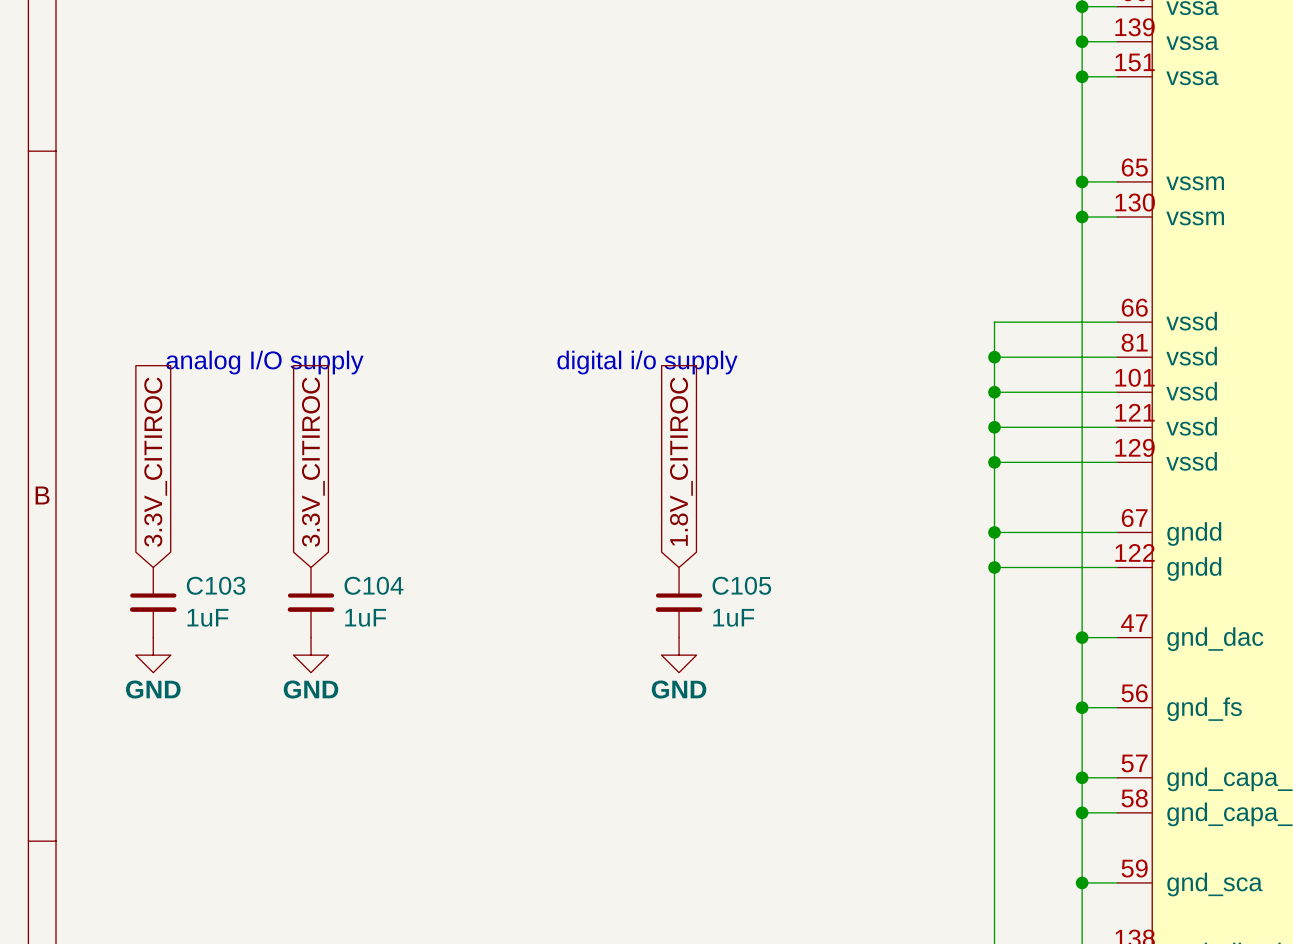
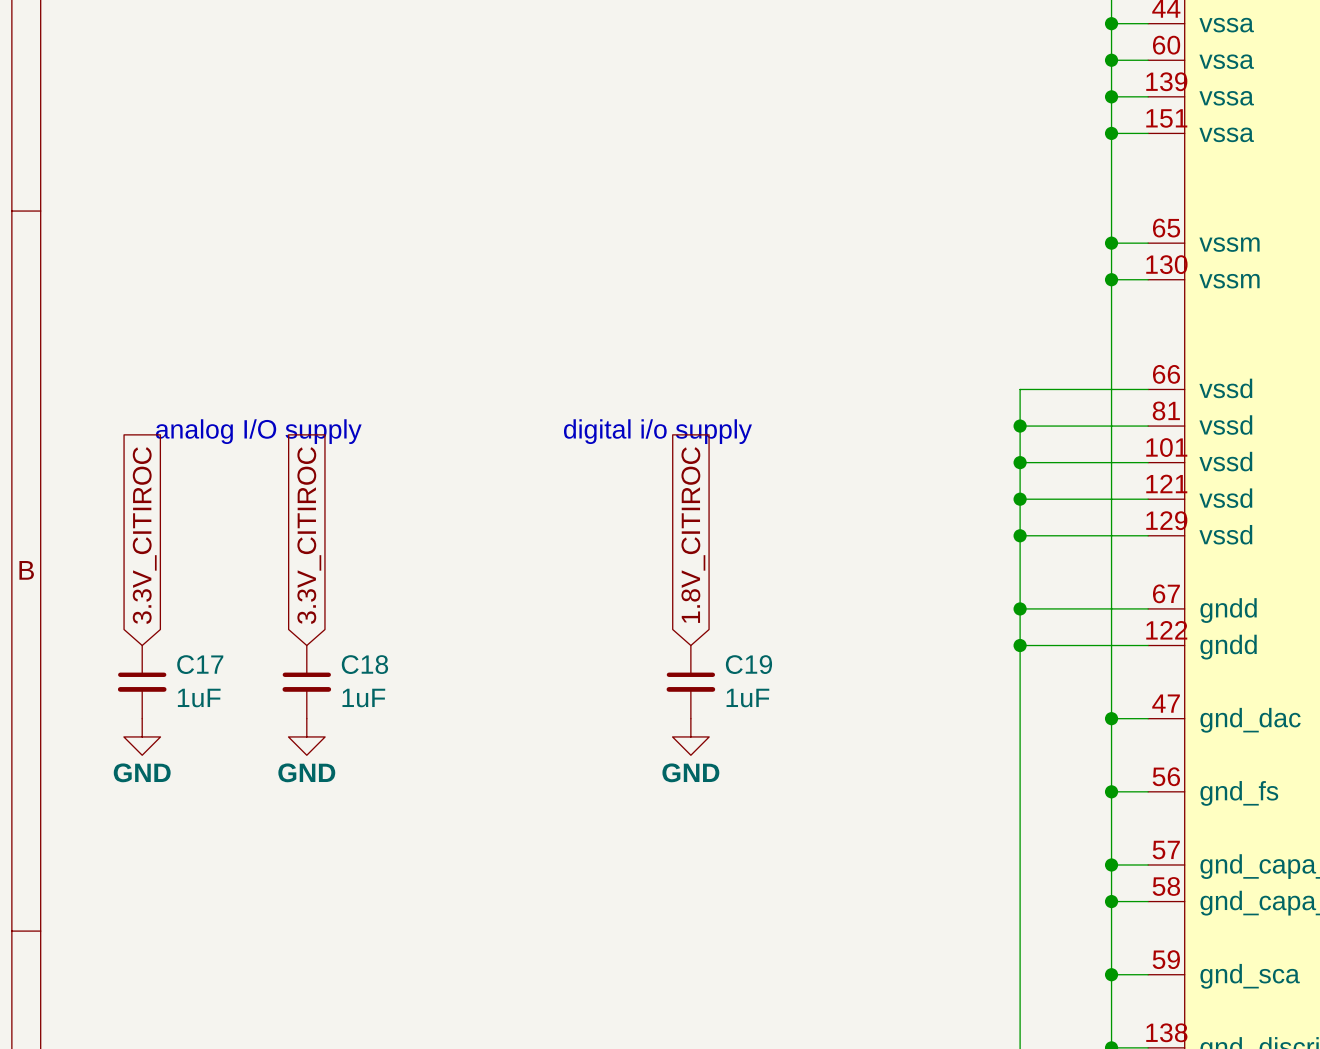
C103 name: C103 (216, 585) -> C17 (200, 664)
C104 name: C104 (373, 585) -> C18 (364, 664)
C105 name: C105 (741, 585) -> C19 (748, 664)

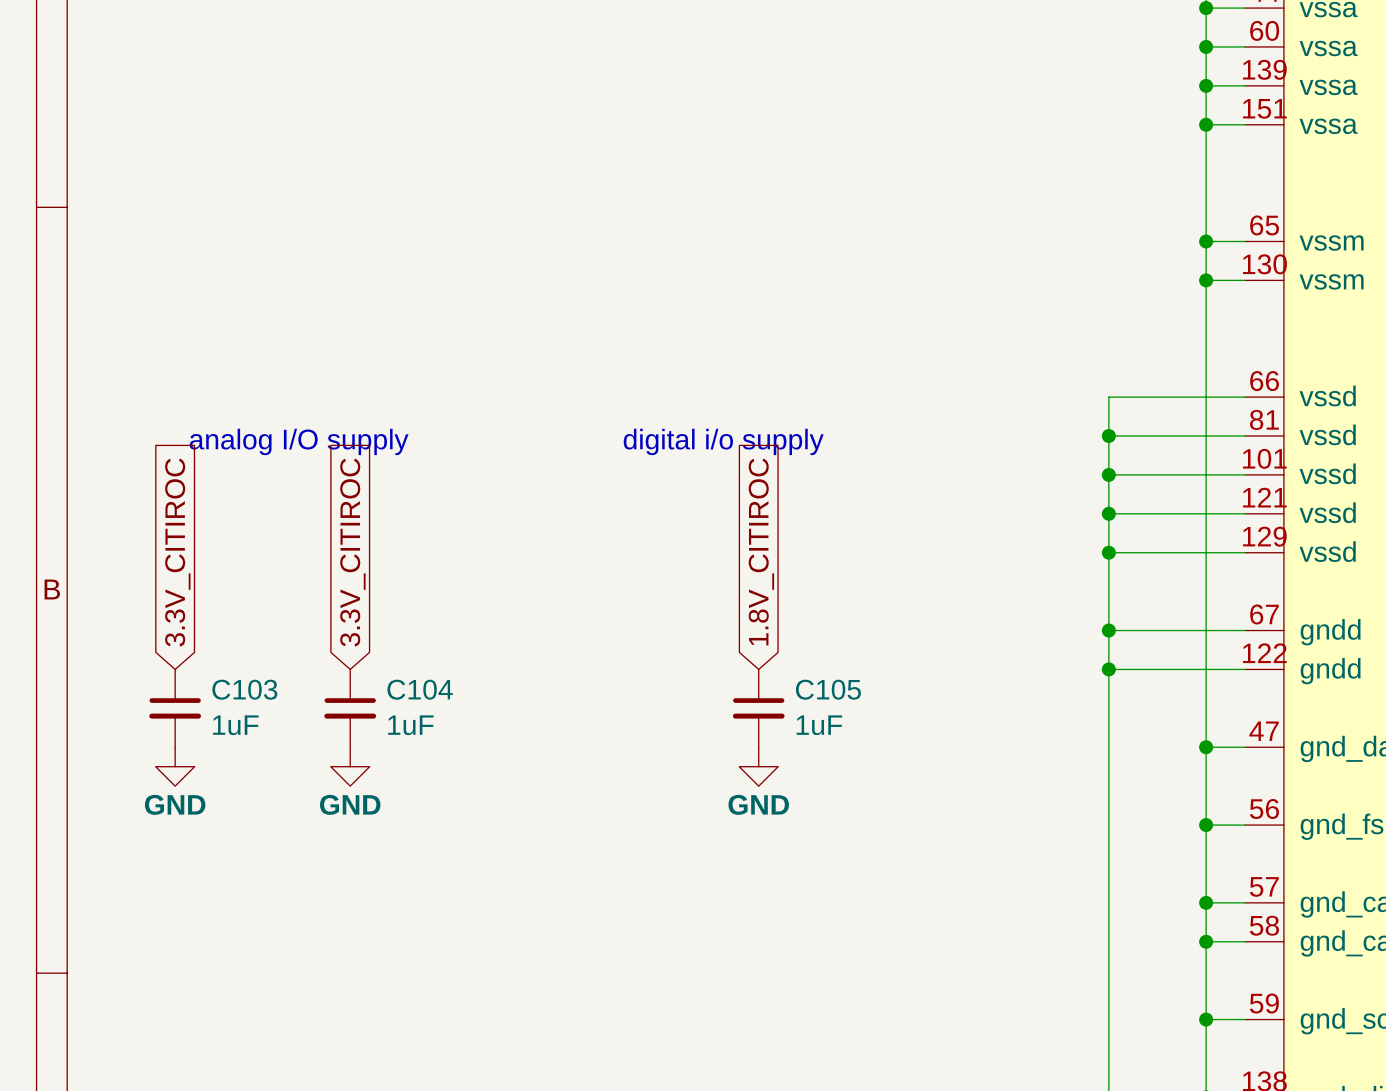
C17 name: C17 (200, 664) -> C103 (244, 689)
C18 name: C18 (364, 664) -> C104 (420, 689)
C19 name: C19 (748, 664) -> C105 (828, 689)

